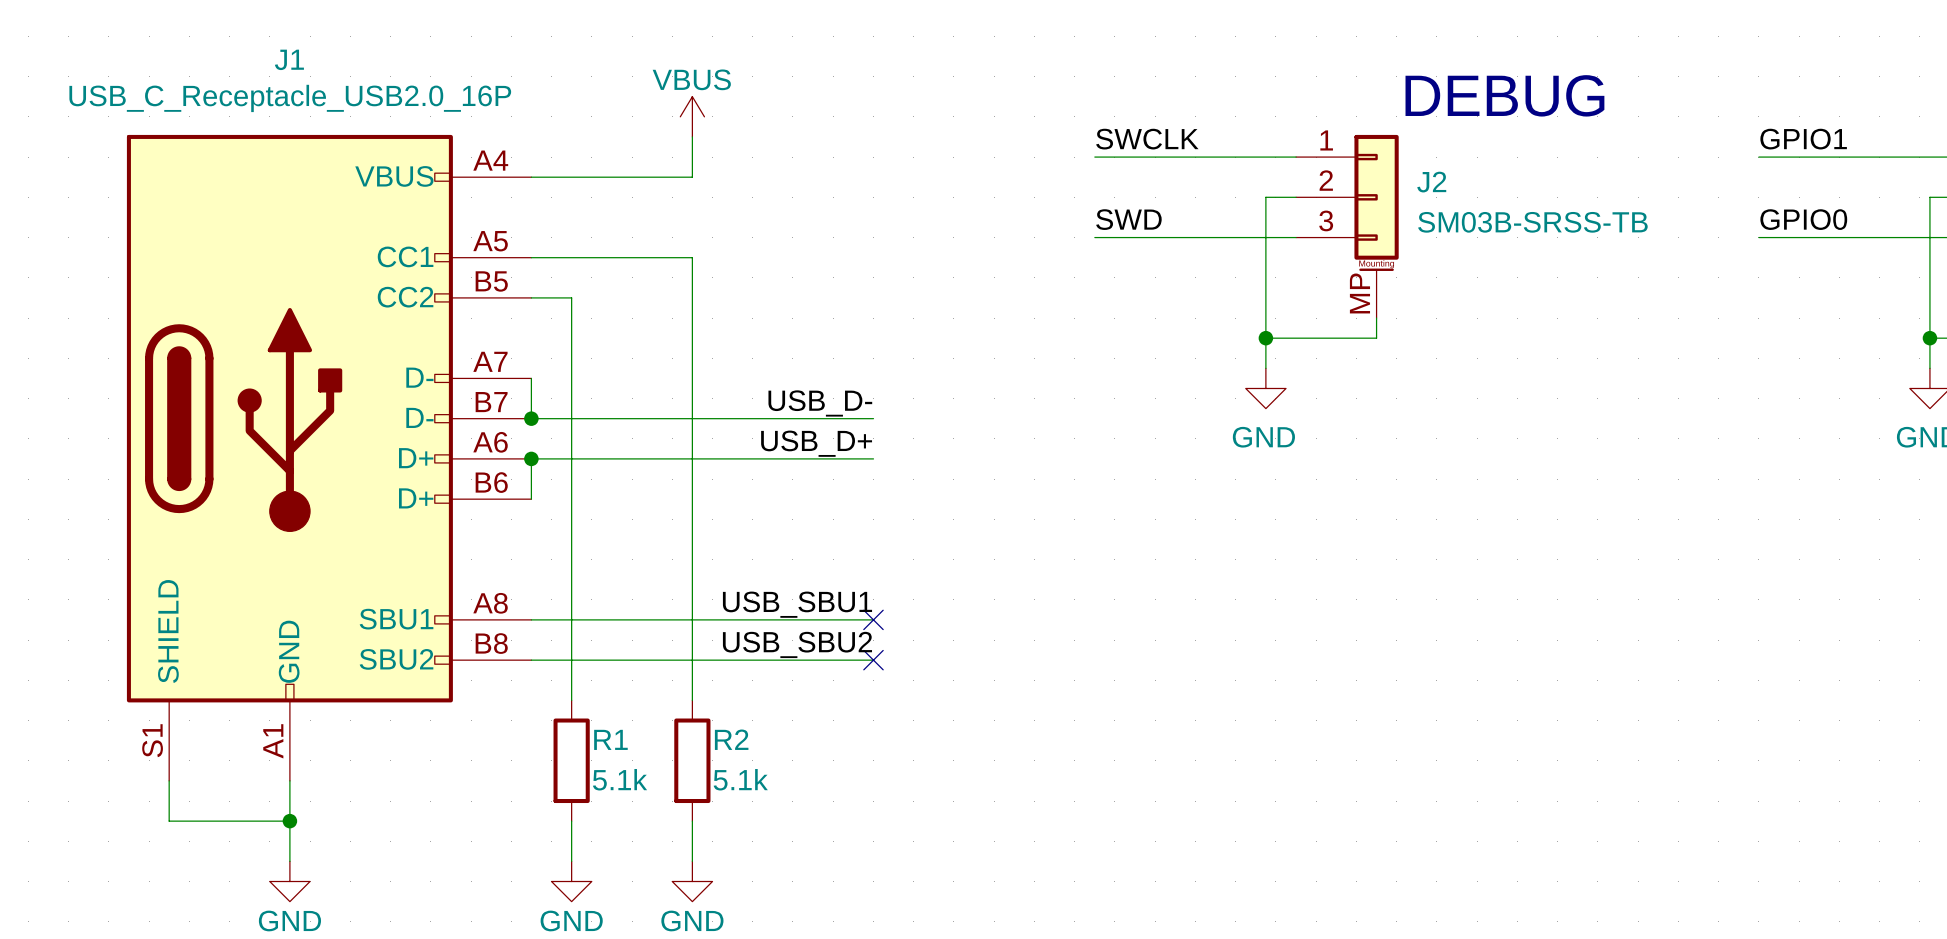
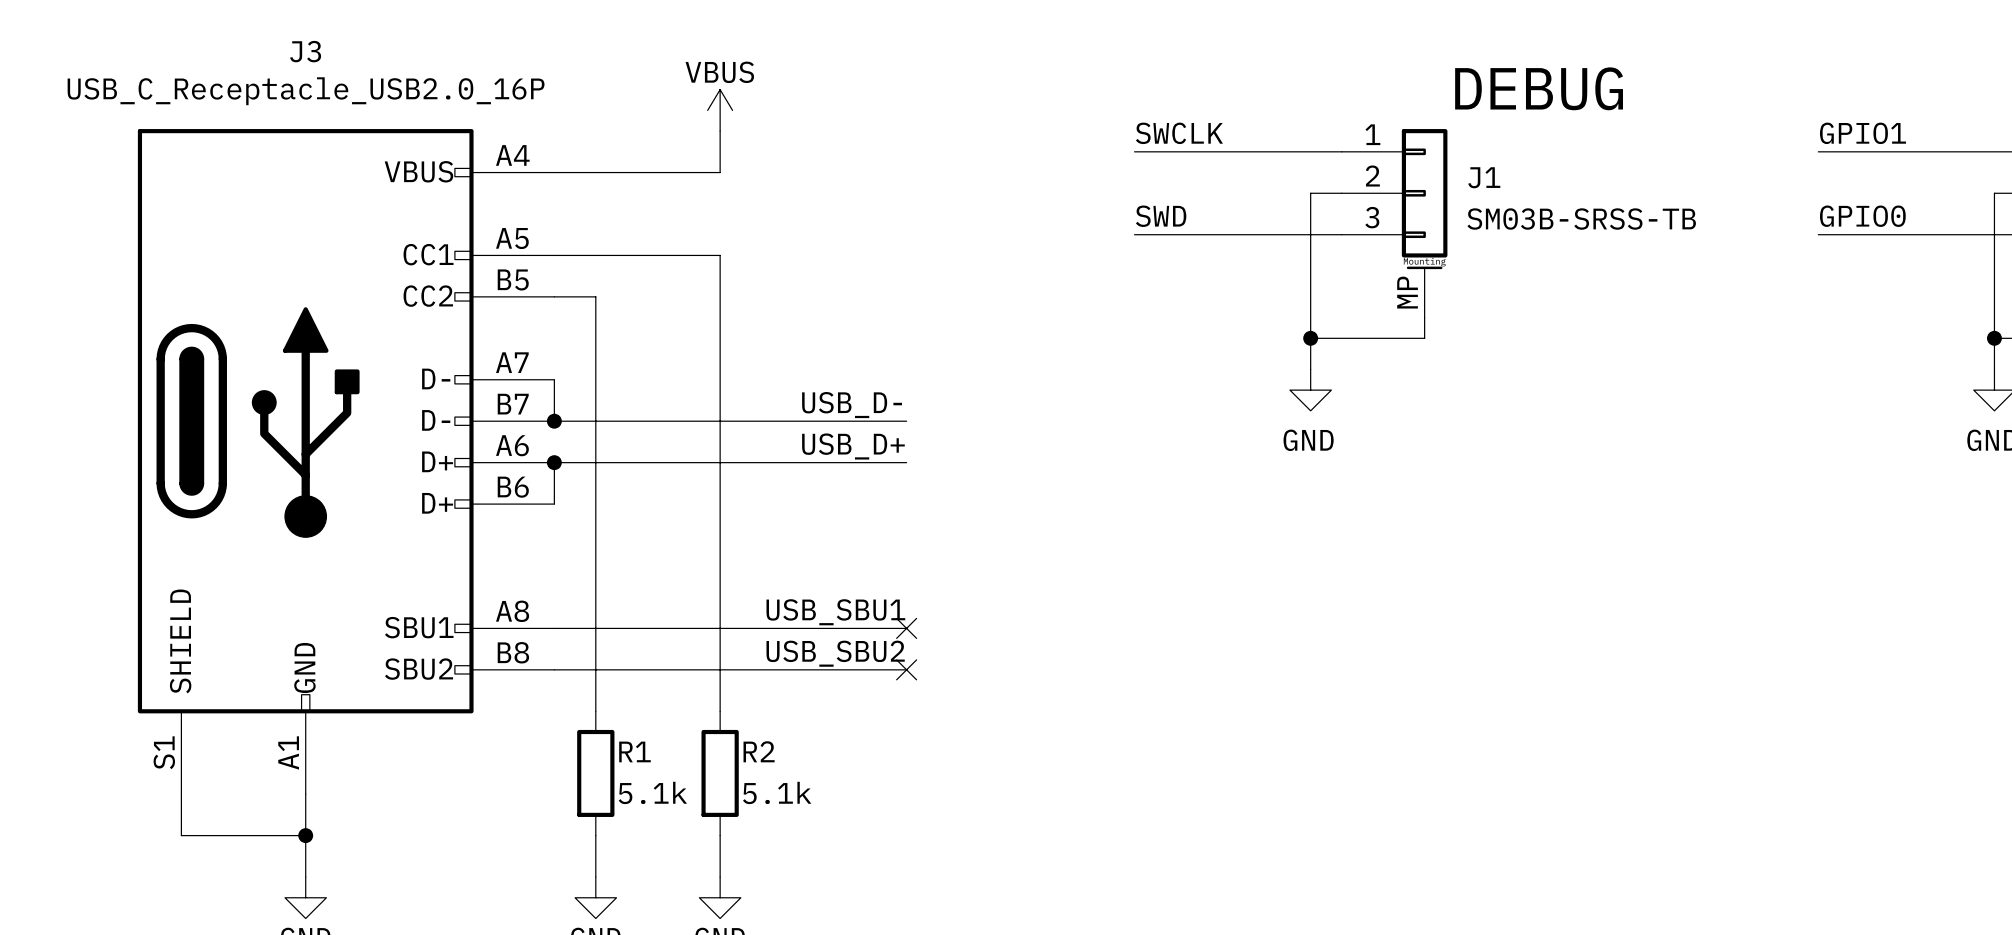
J1 name: J1 (289, 59) -> J3 (305, 51)
J2 name: J2 (1431, 182) -> J1 (1484, 177)

